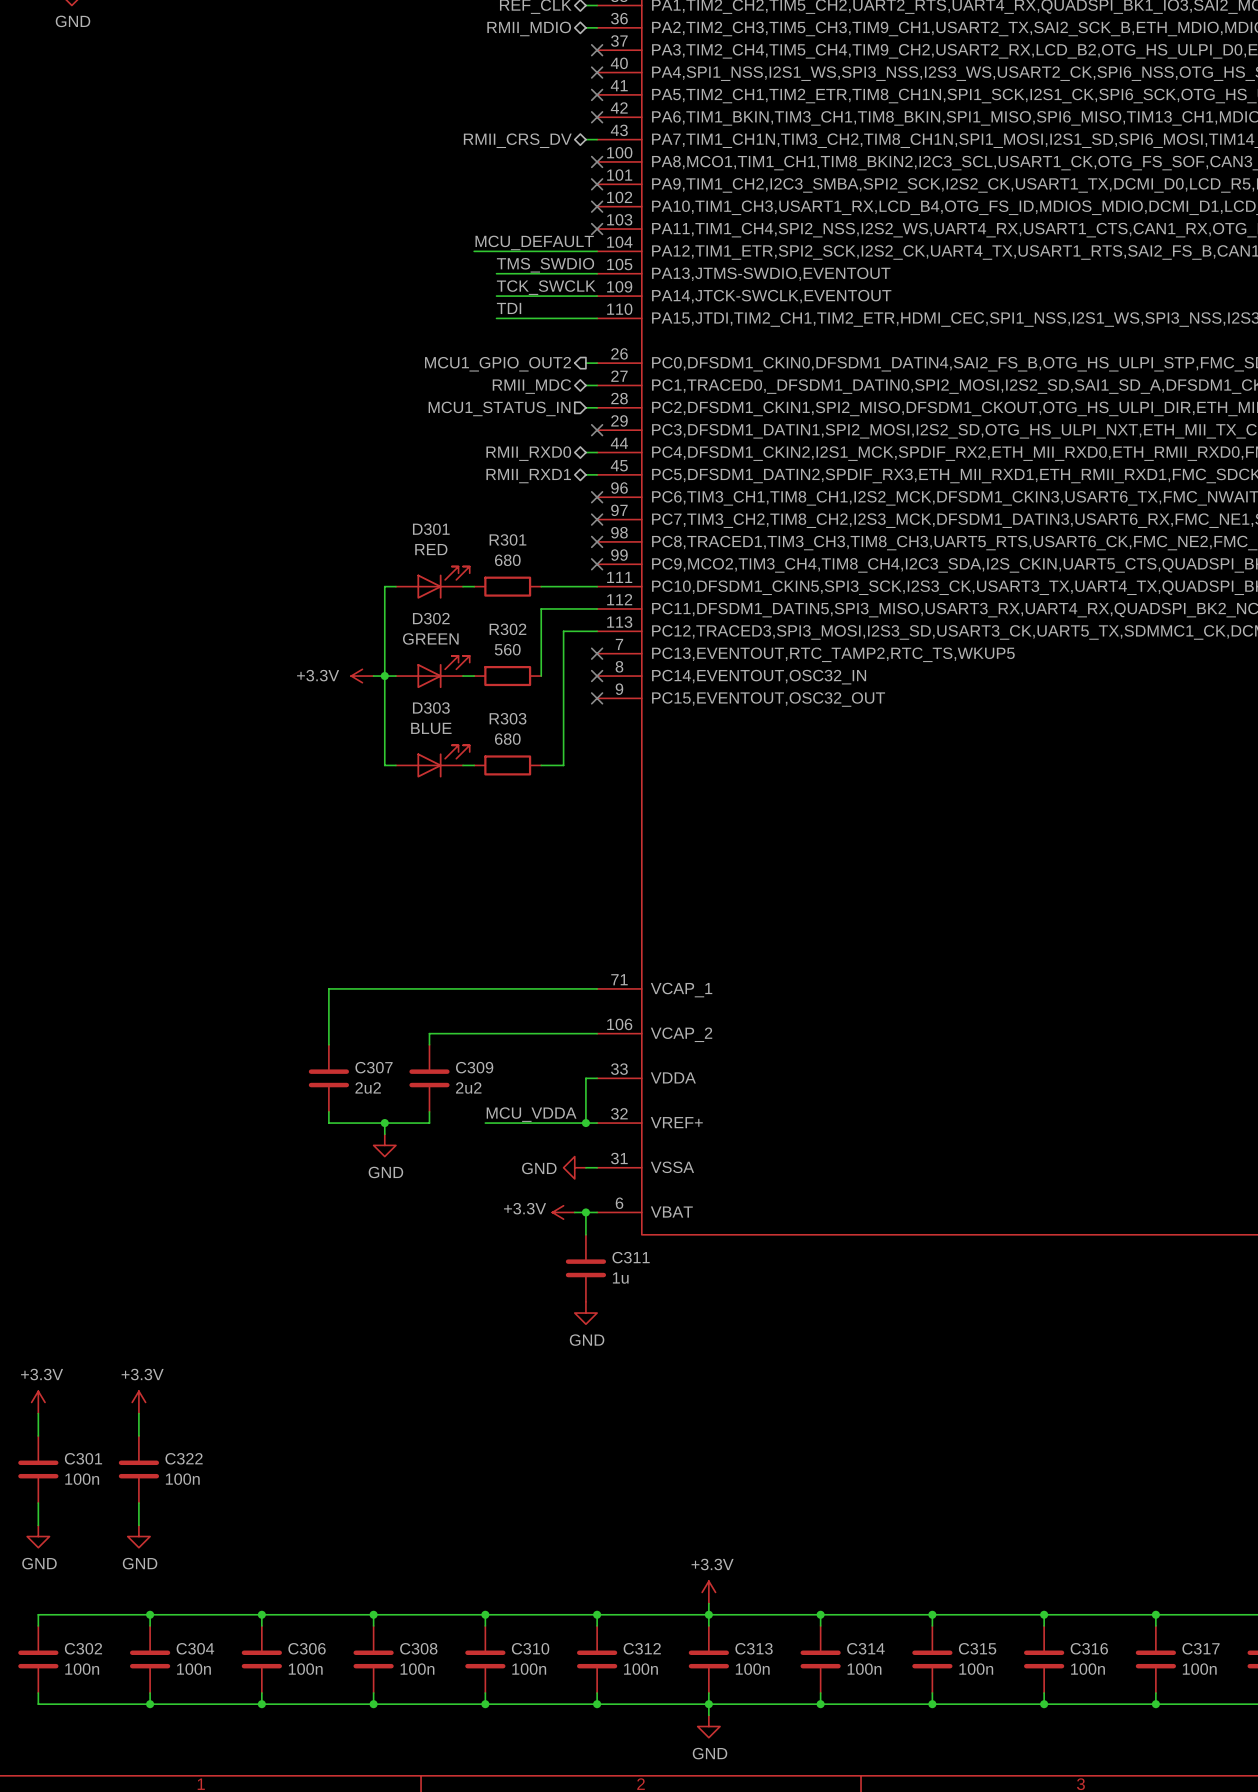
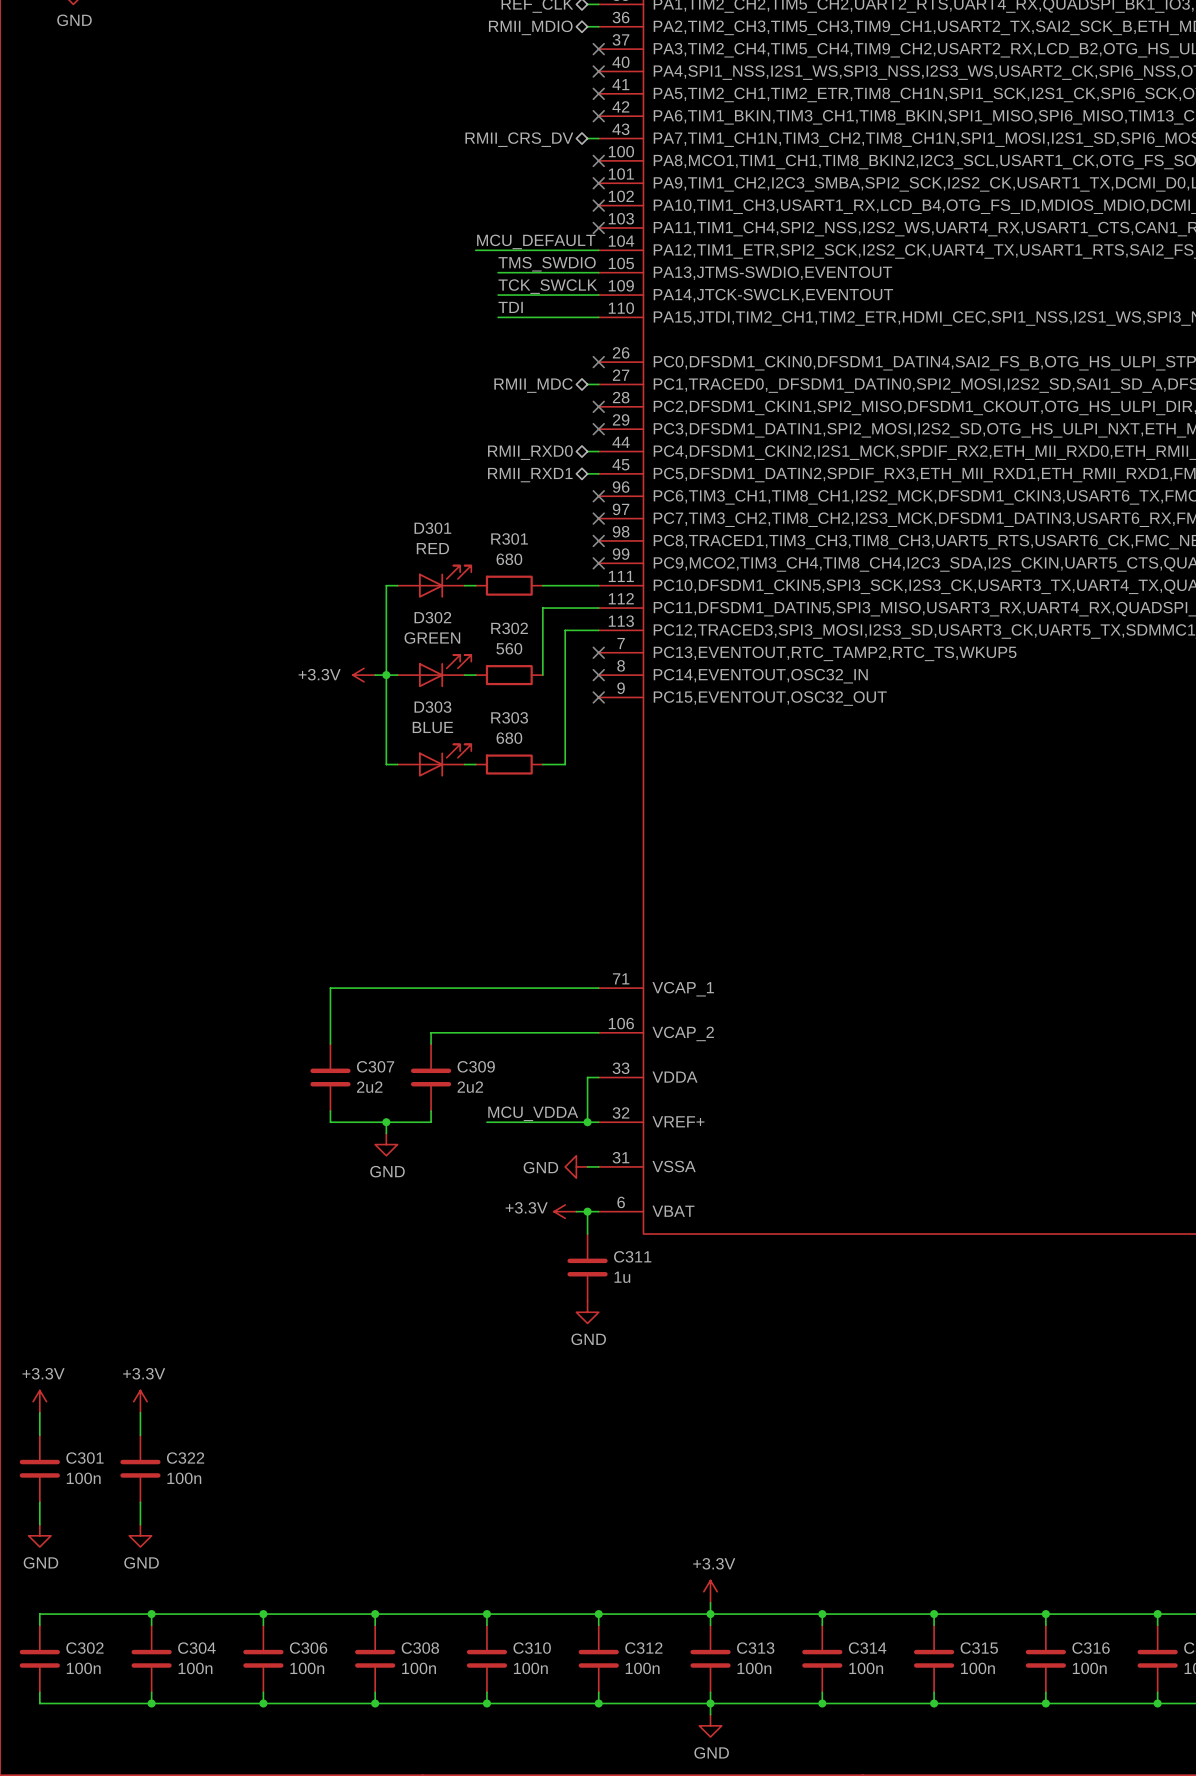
wire: (585, 363) (597, 363) -> none
no-connect mark: none -> (598, 362)
hierarchical label: MCU1_GPIO_OUT2 (497, 364) -> none
wire: (585, 407) (597, 407) -> none
no-connect mark: none -> (598, 406)
hierarchical label: MCU1_STATUS_IN (499, 408) -> none

